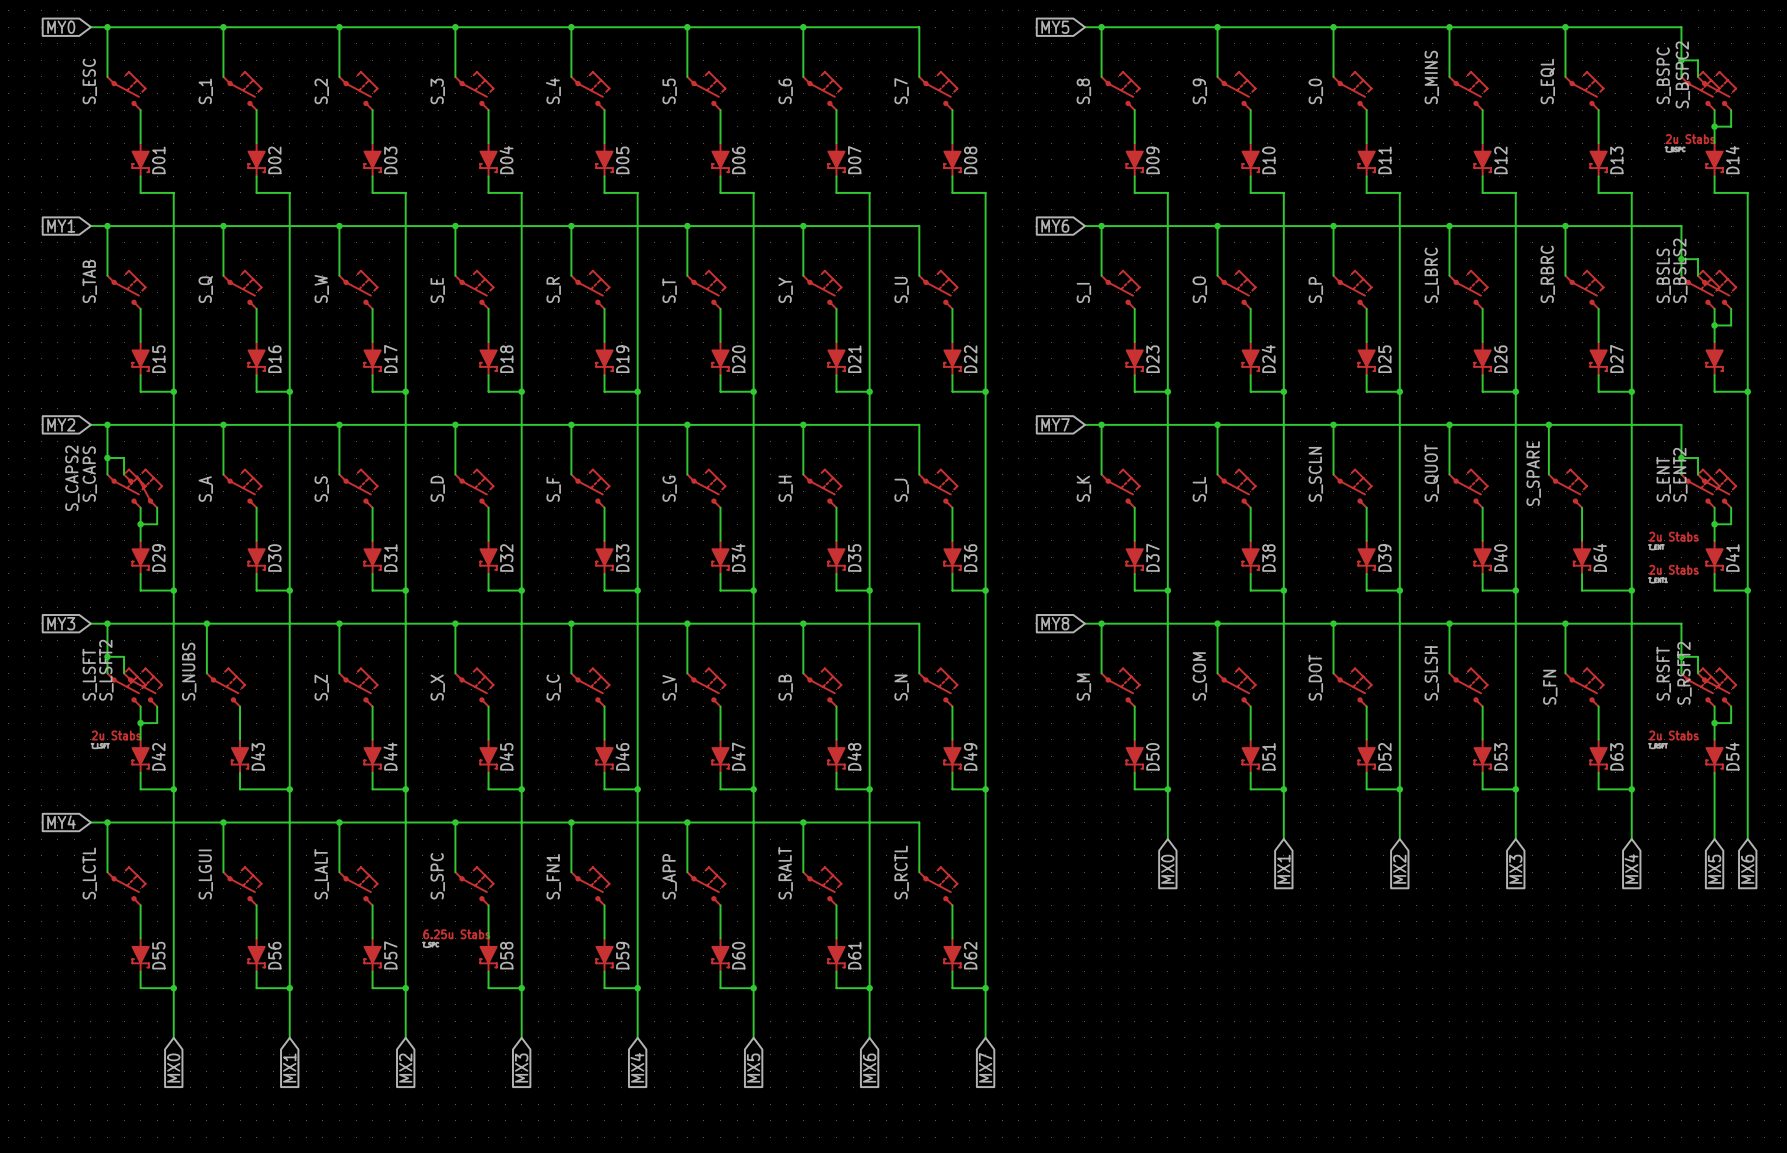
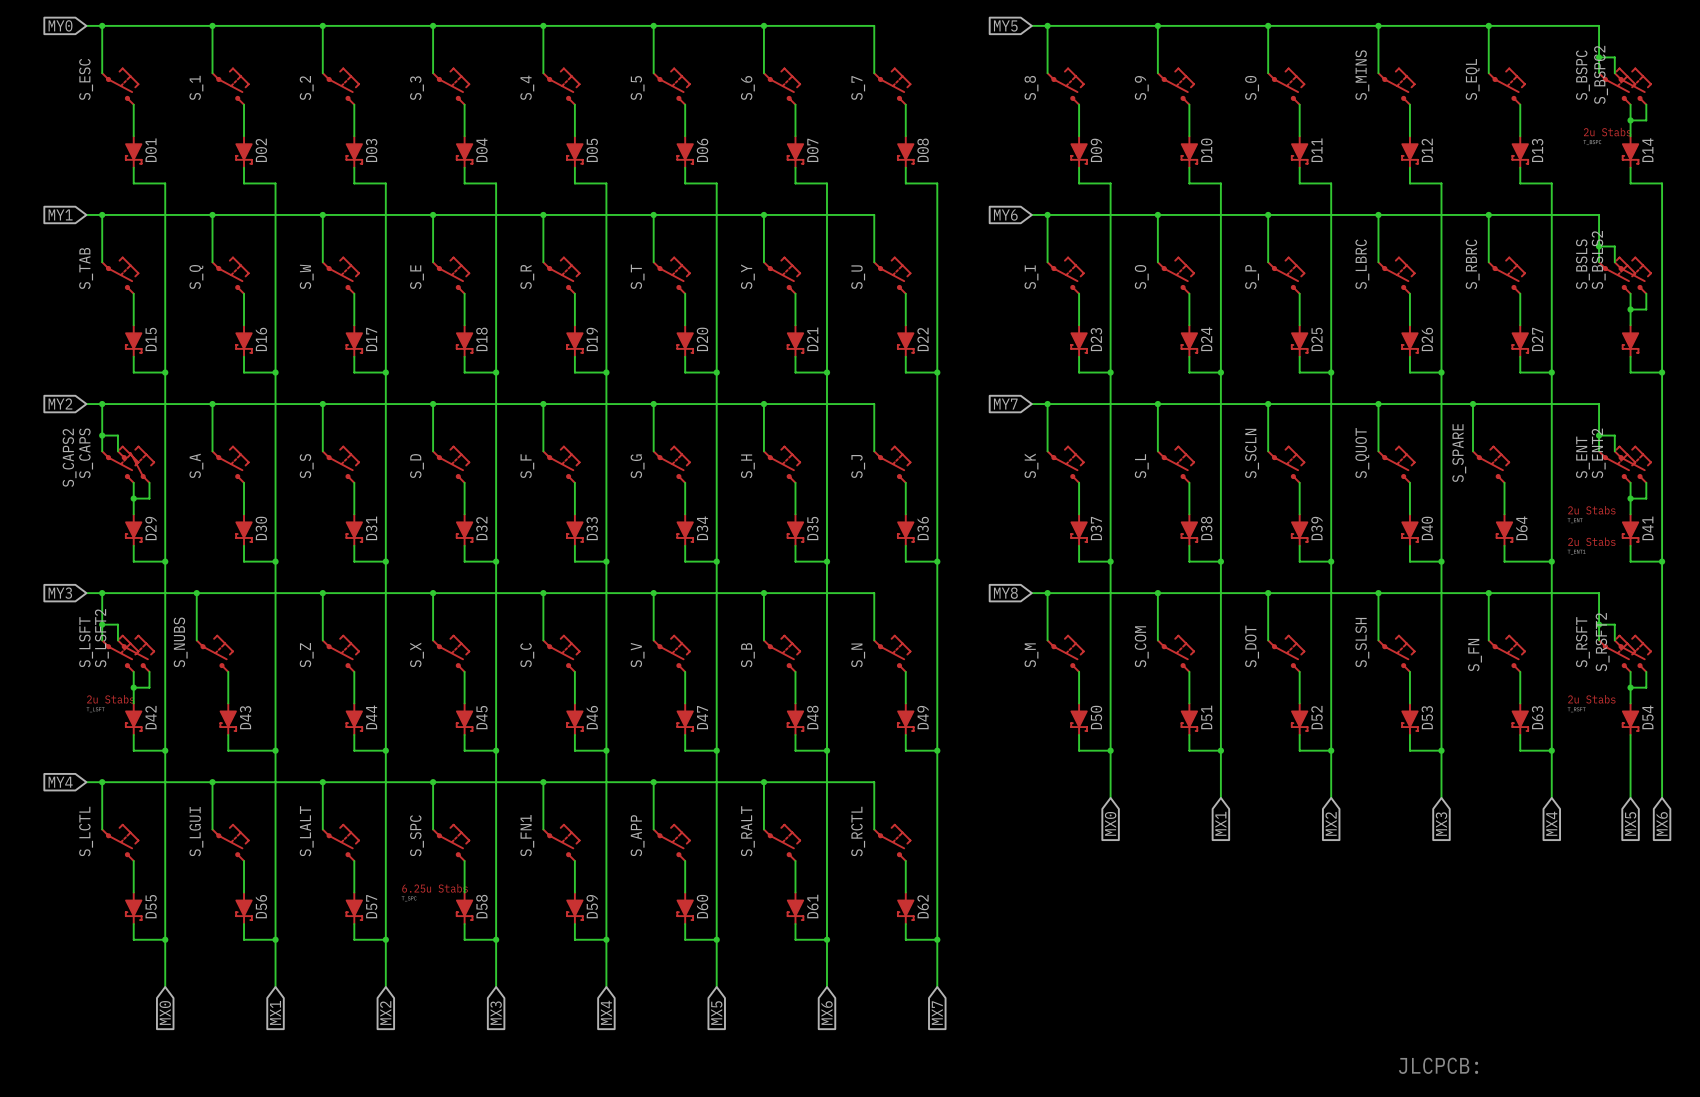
part: none -> (1438, 1065)

